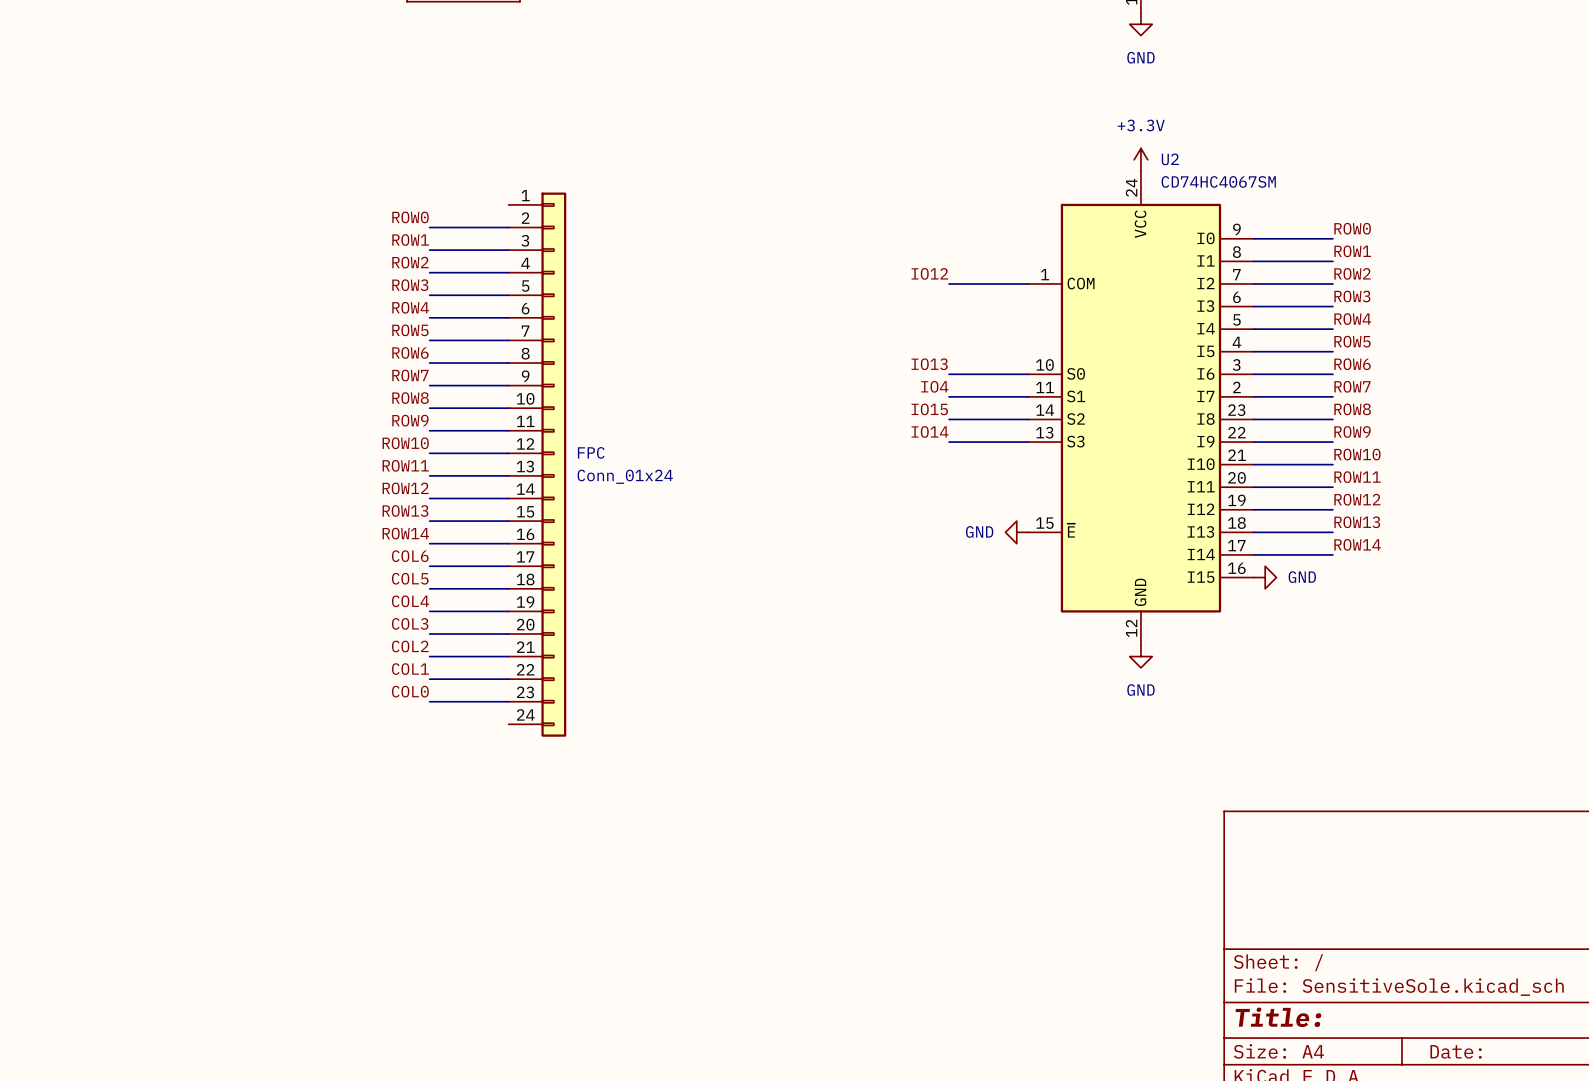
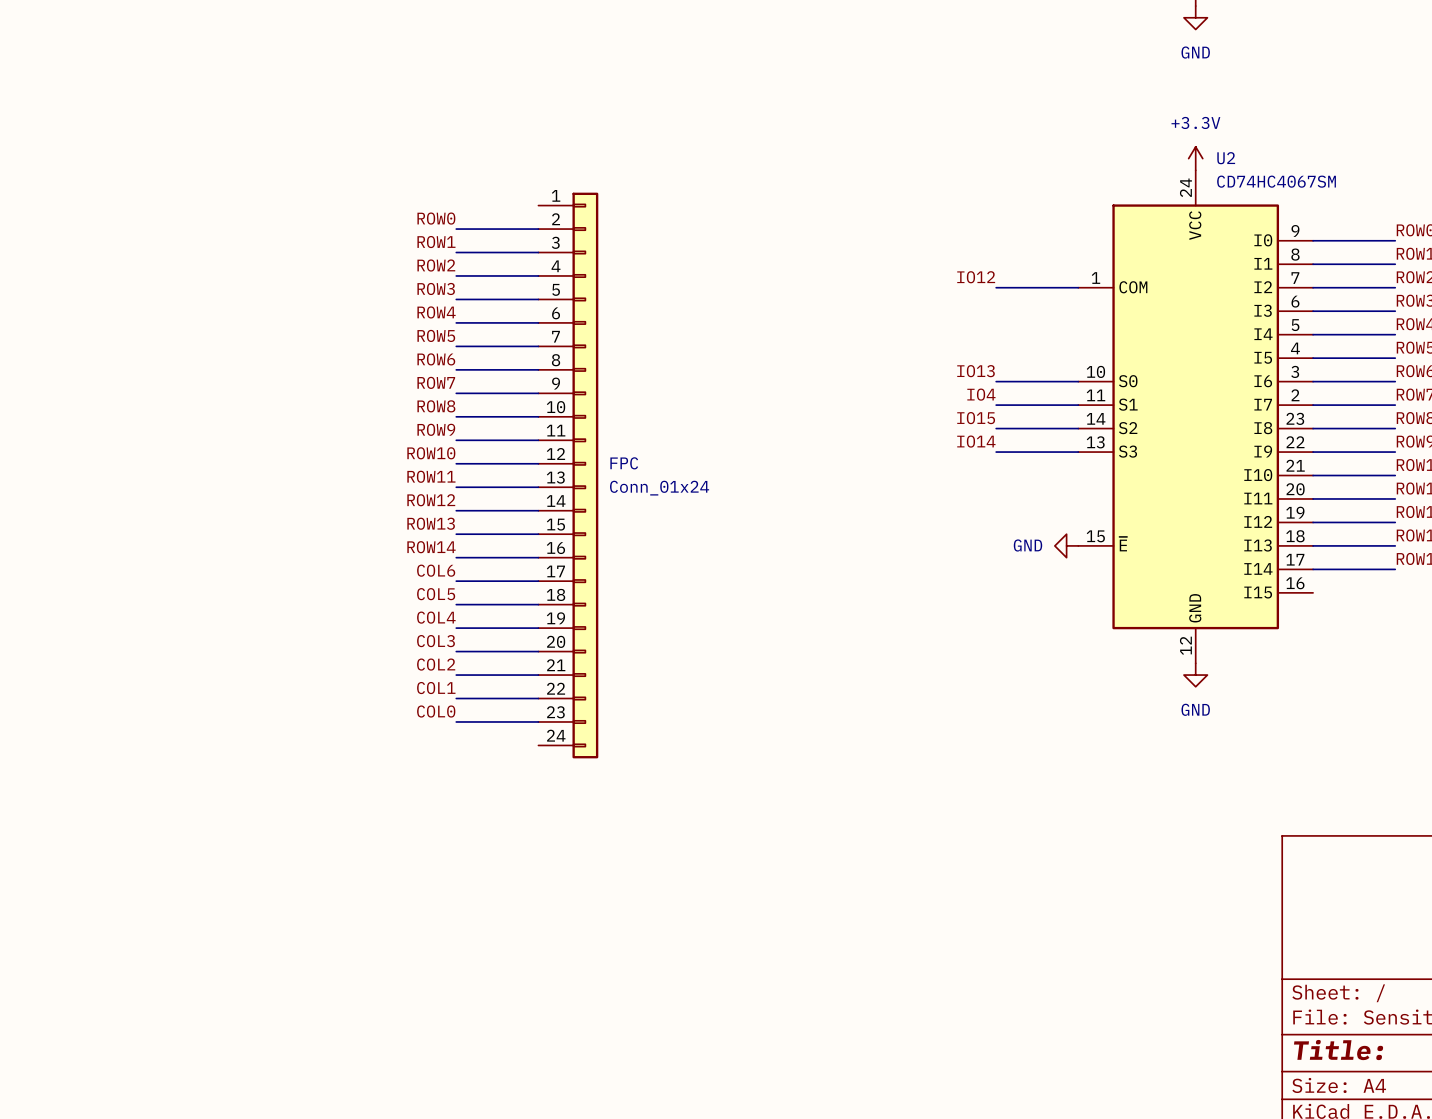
power symbol: GND (1265, 577) -> none

